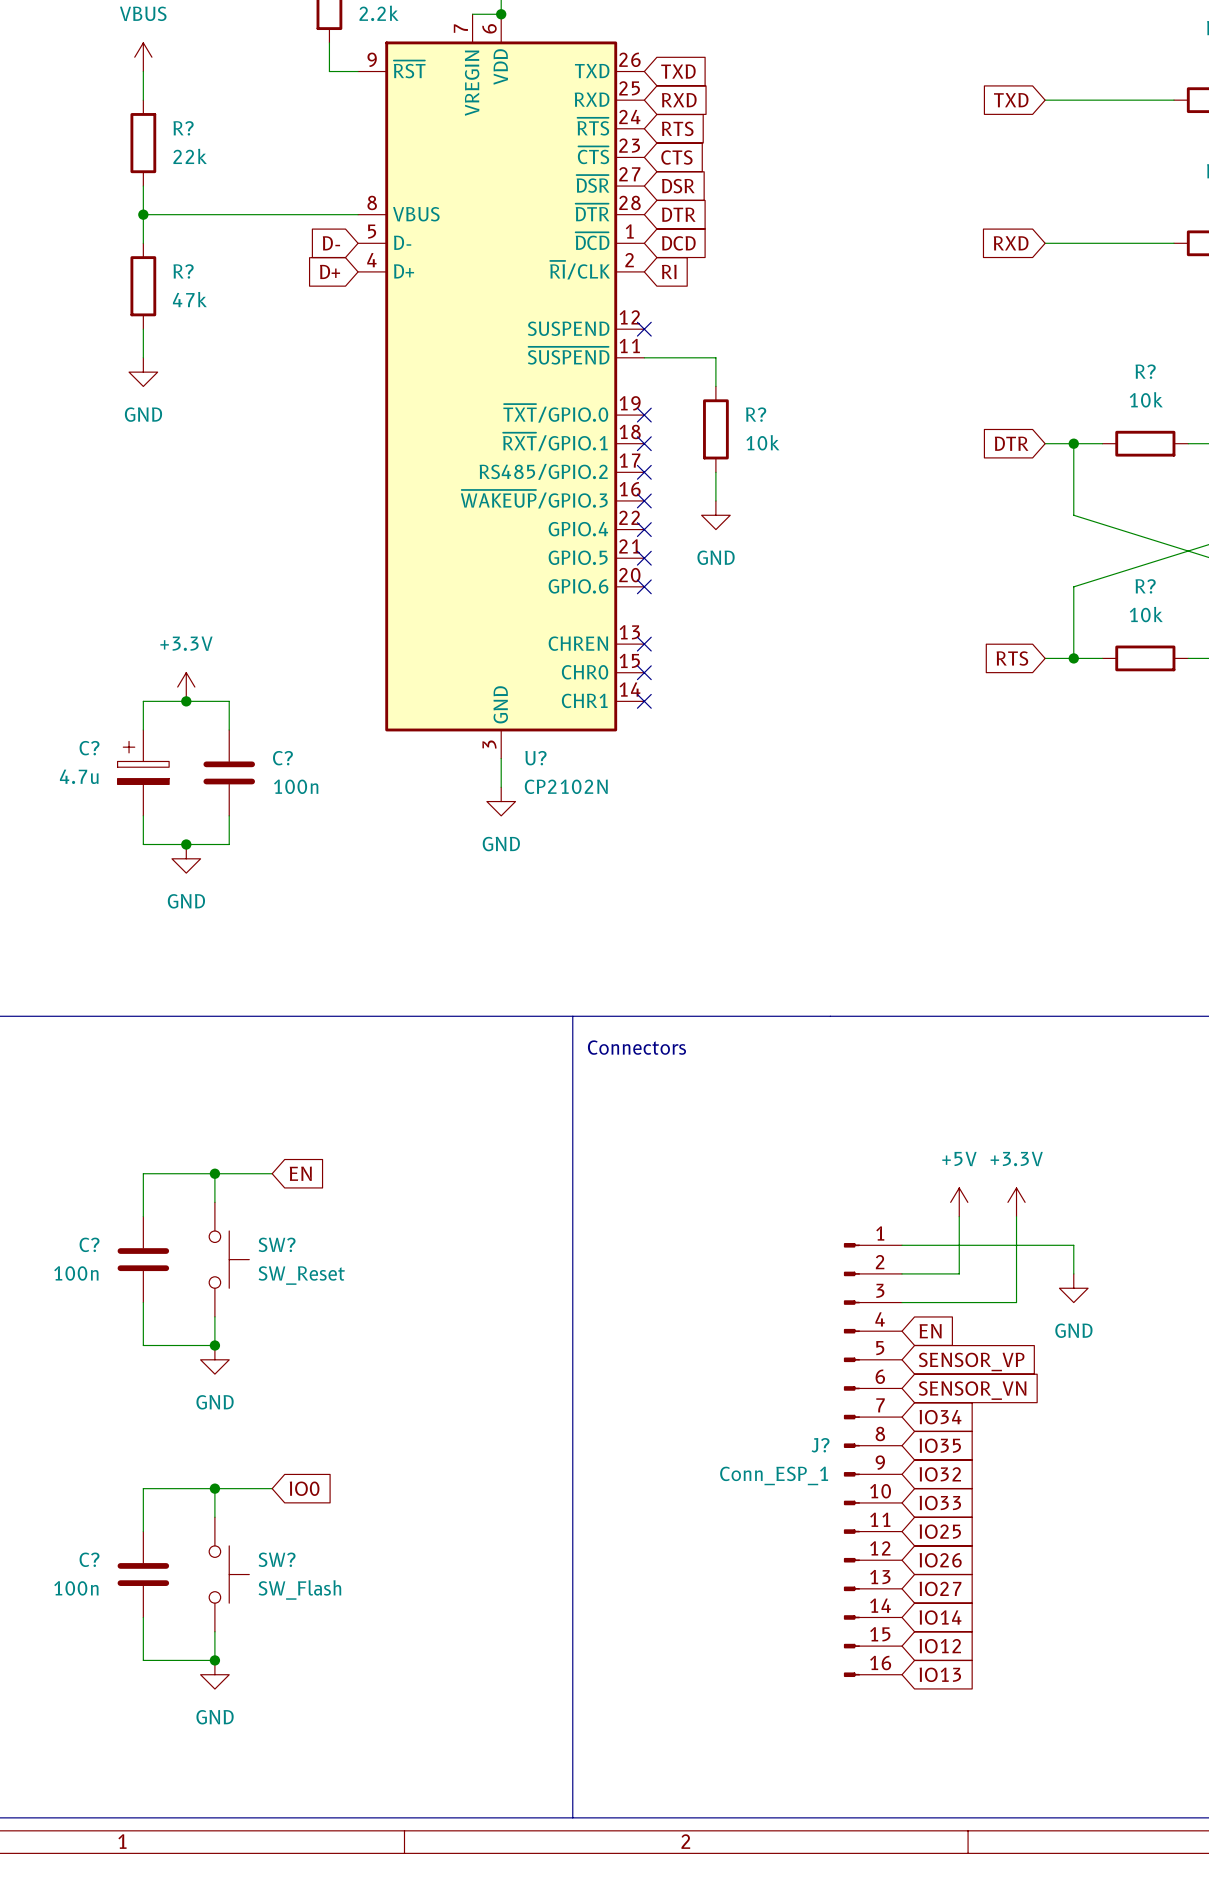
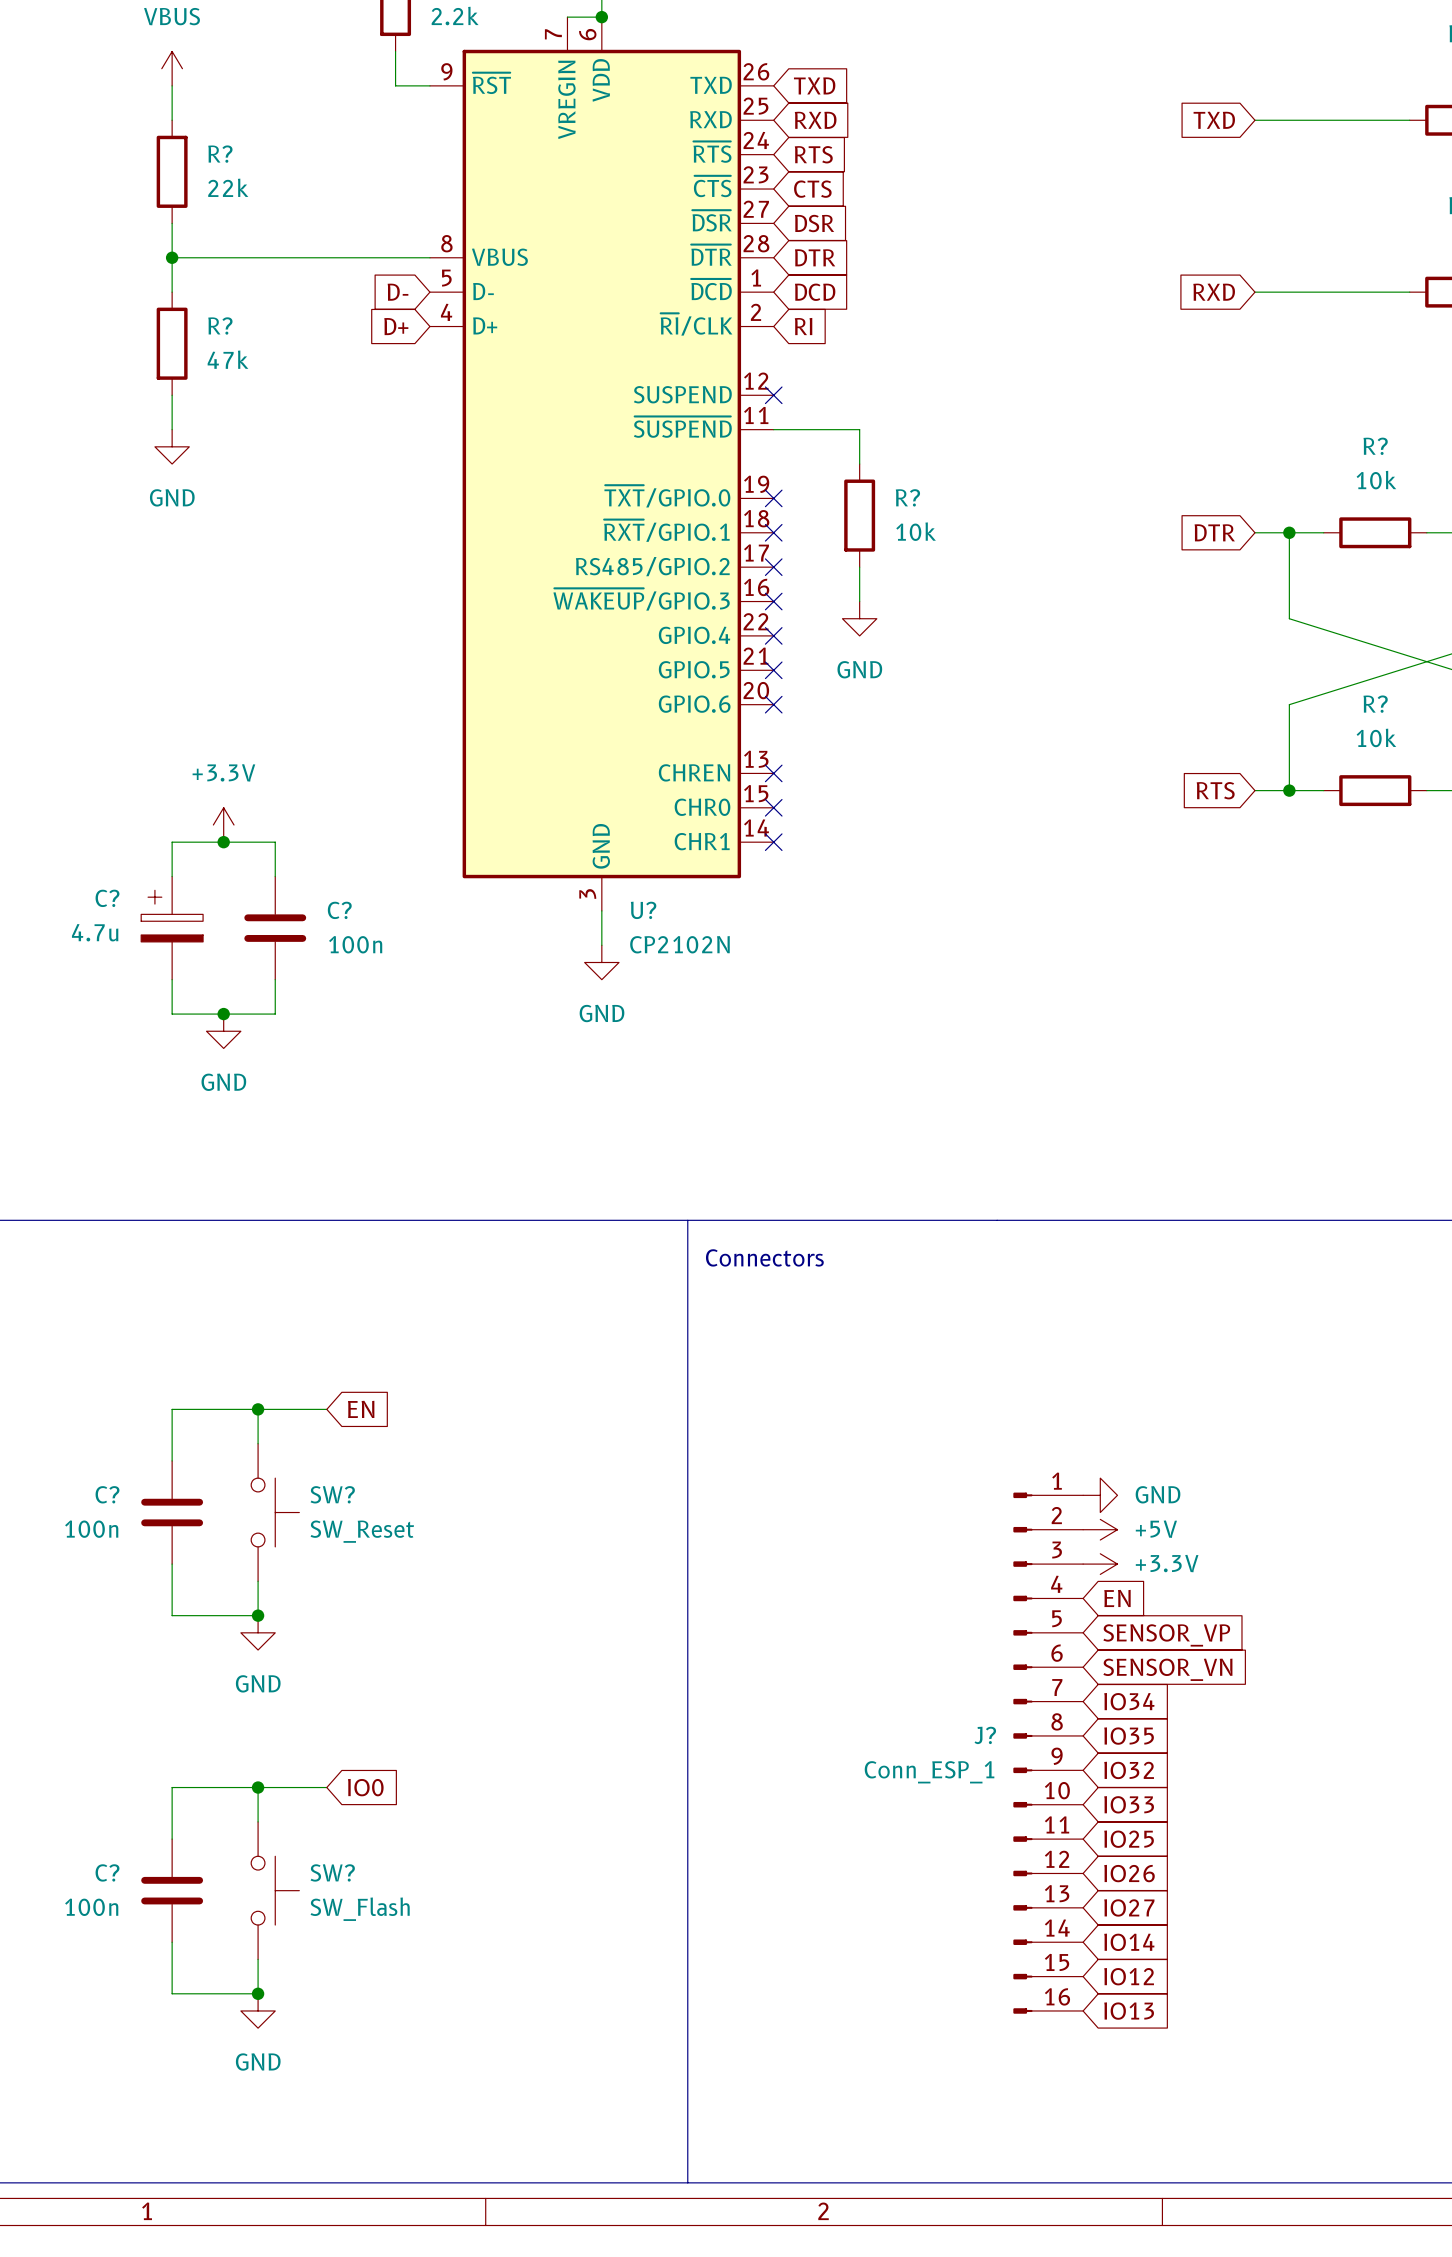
power symbol text position: +3.3V (1016, 1158) -> +3.3V (1167, 1563)
power symbol rotation: 0° (959, 1202) -> 90° clockwise (1100, 1529)
power symbol position: +5V (959, 1202) -> +5V (1100, 1529)
power symbol rotation: 0° (1016, 1202) -> 90° clockwise (1100, 1564)
power symbol position: +3.3V (1016, 1202) -> +3.3V (1100, 1564)
wire: (959, 1216) (959, 1273) (902, 1273) -> none
wire: (1016, 1216) (1016, 1302) (902, 1302) -> none
wire: (902, 1245) (1073, 1245) (1073, 1273) -> none
power symbol rotation: 0° (1073, 1288) -> 90° counterclockwise (1100, 1495)
power symbol position: GND (1073, 1288) -> GND (1100, 1495)

